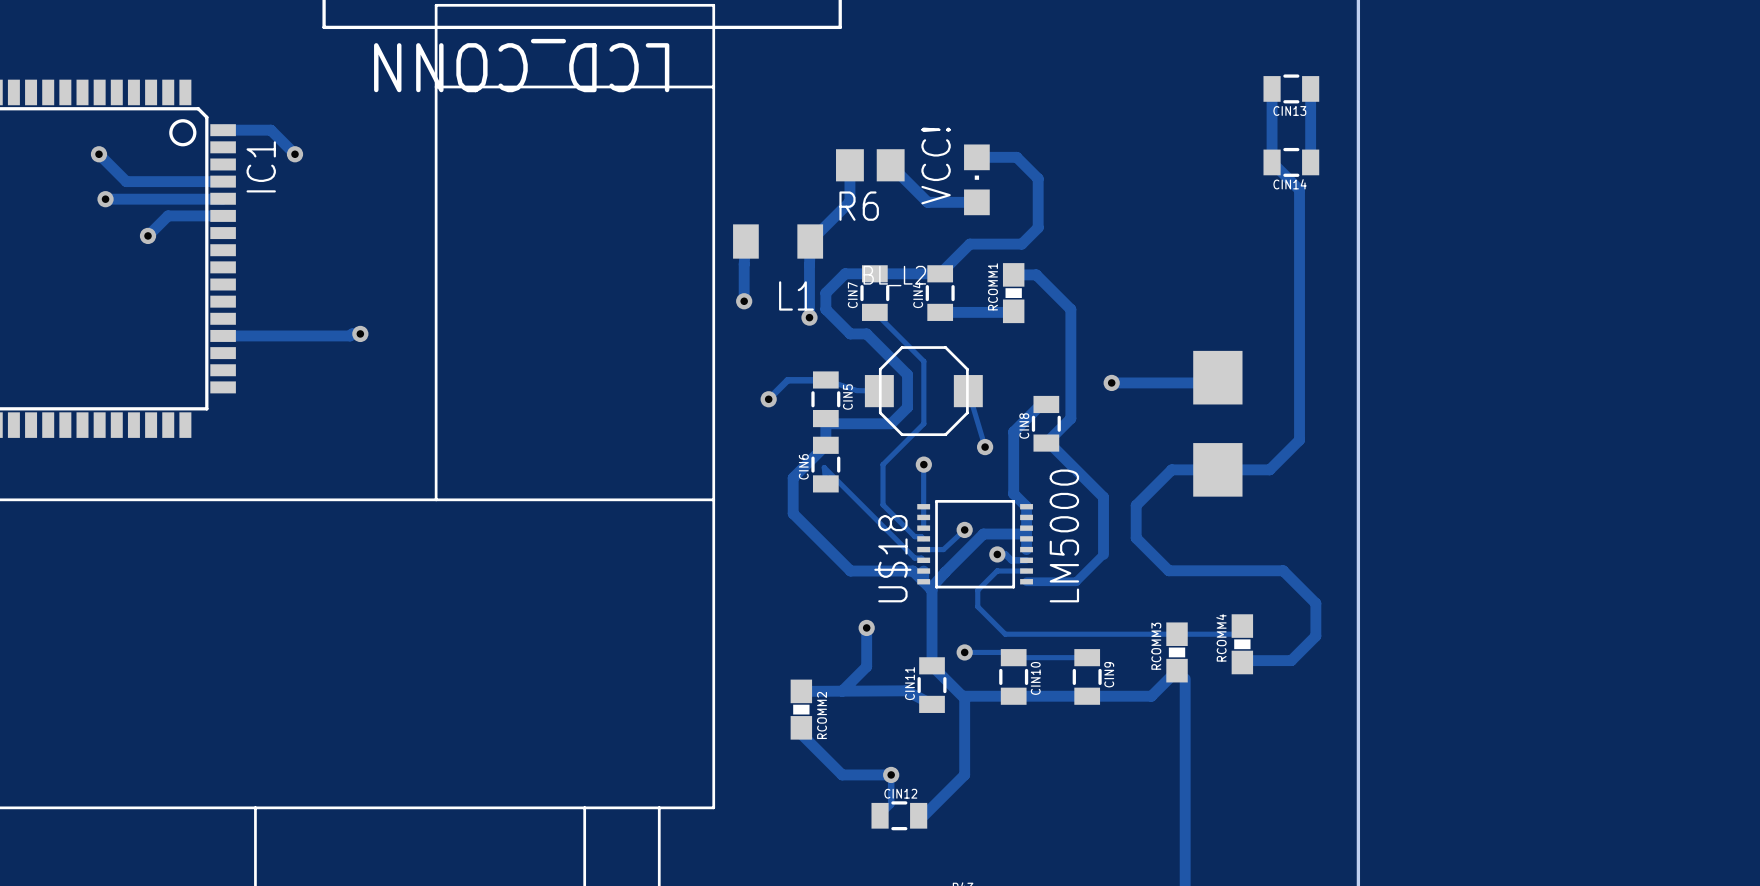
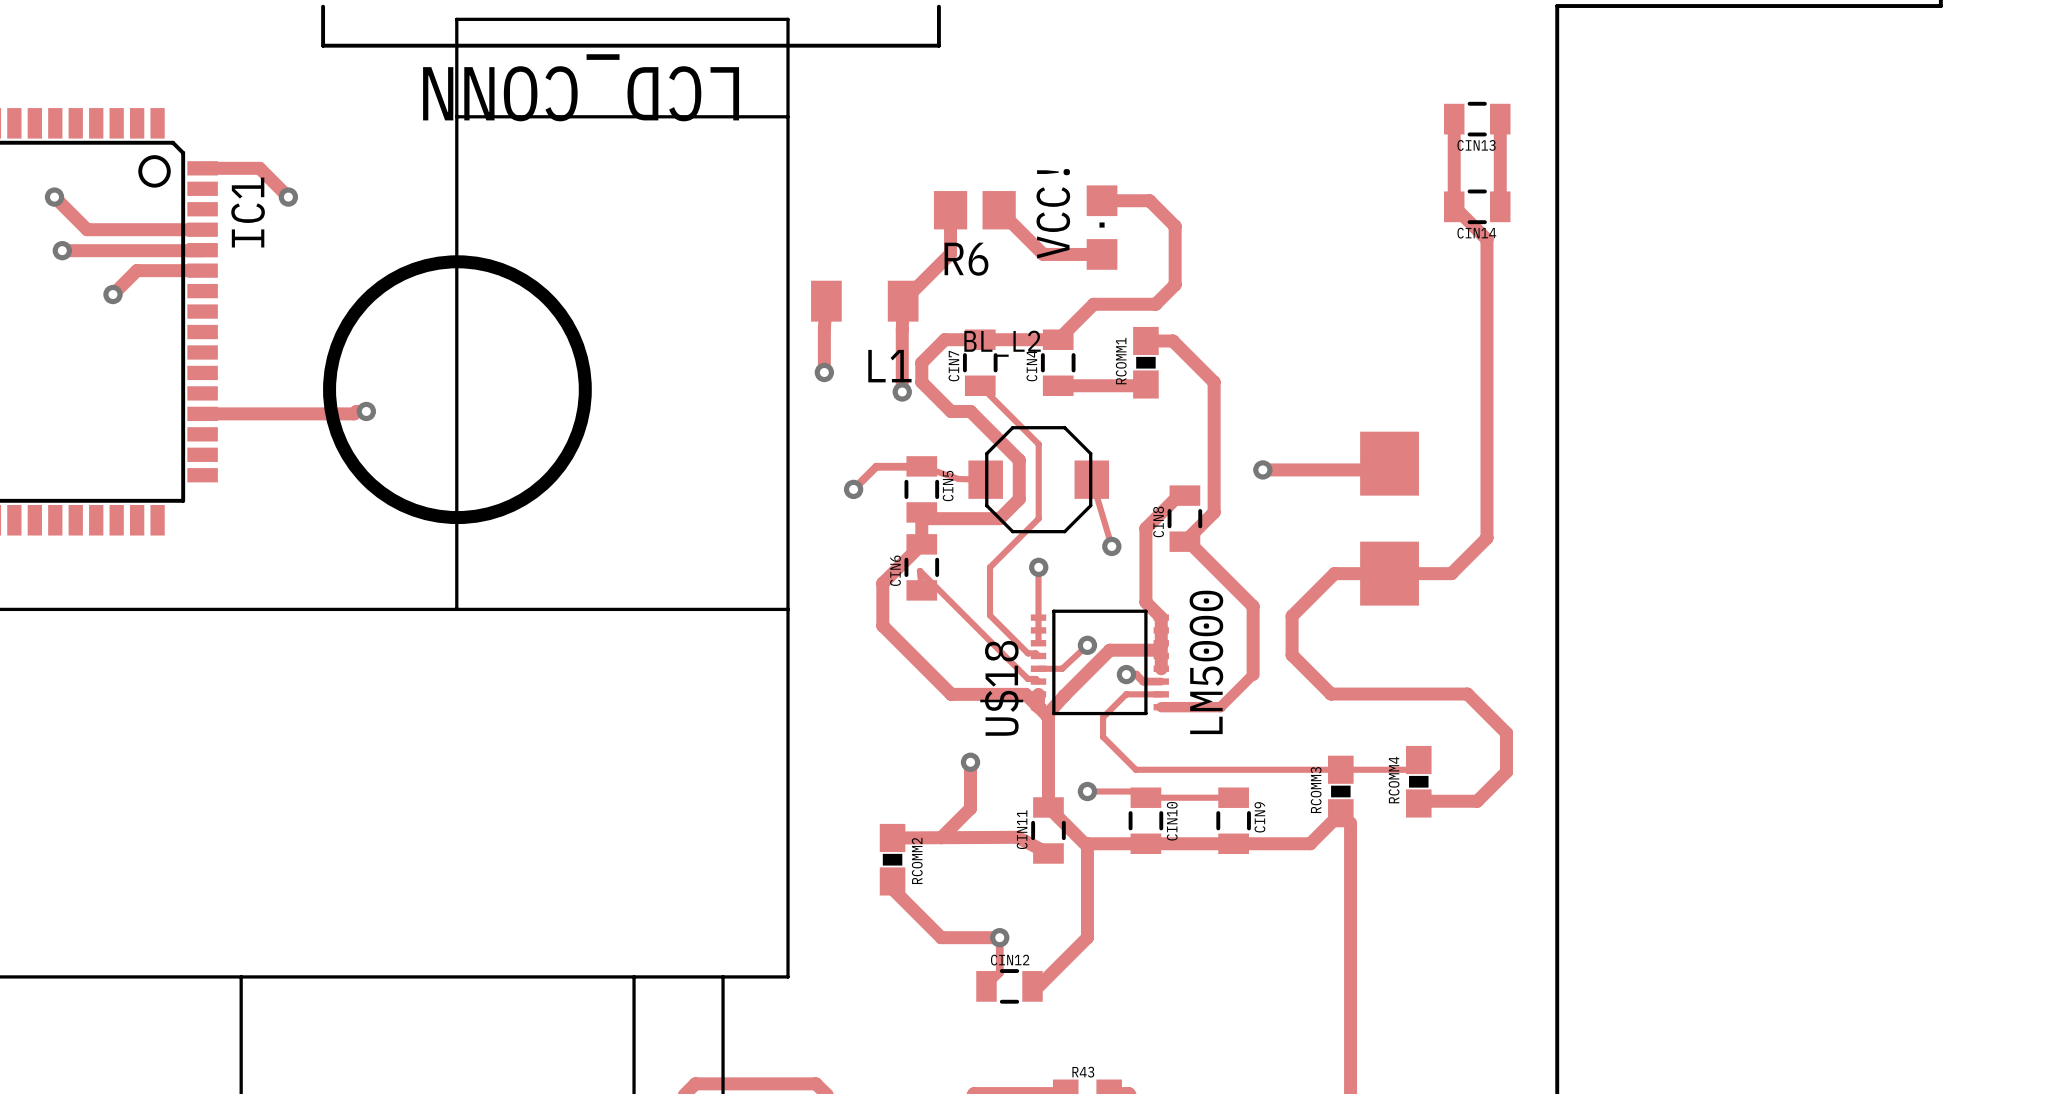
round board edge: none -> [323, 255, 592, 525]

